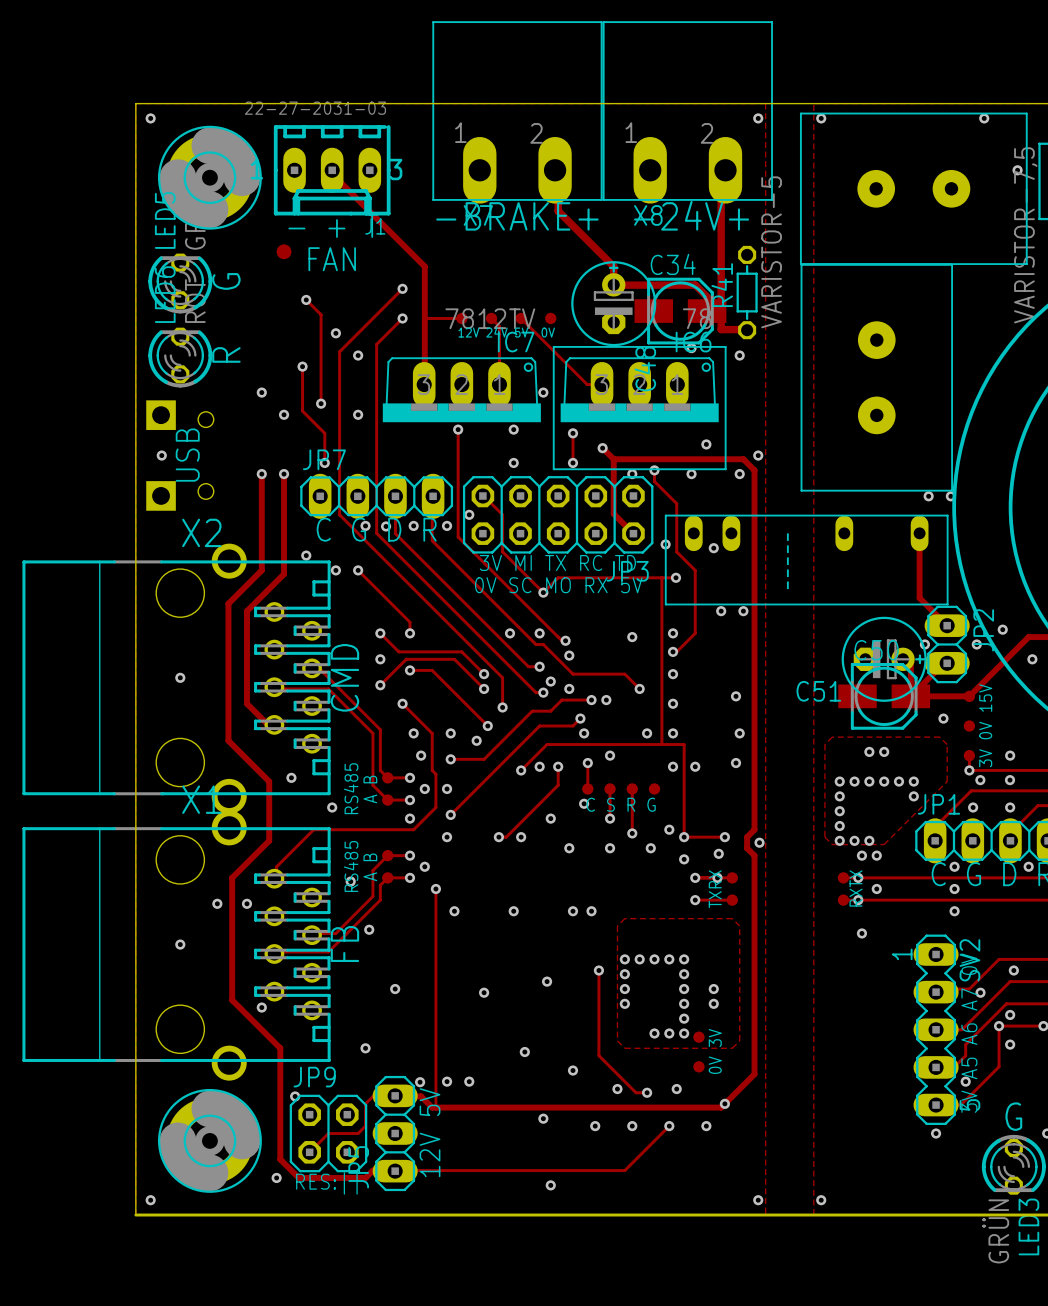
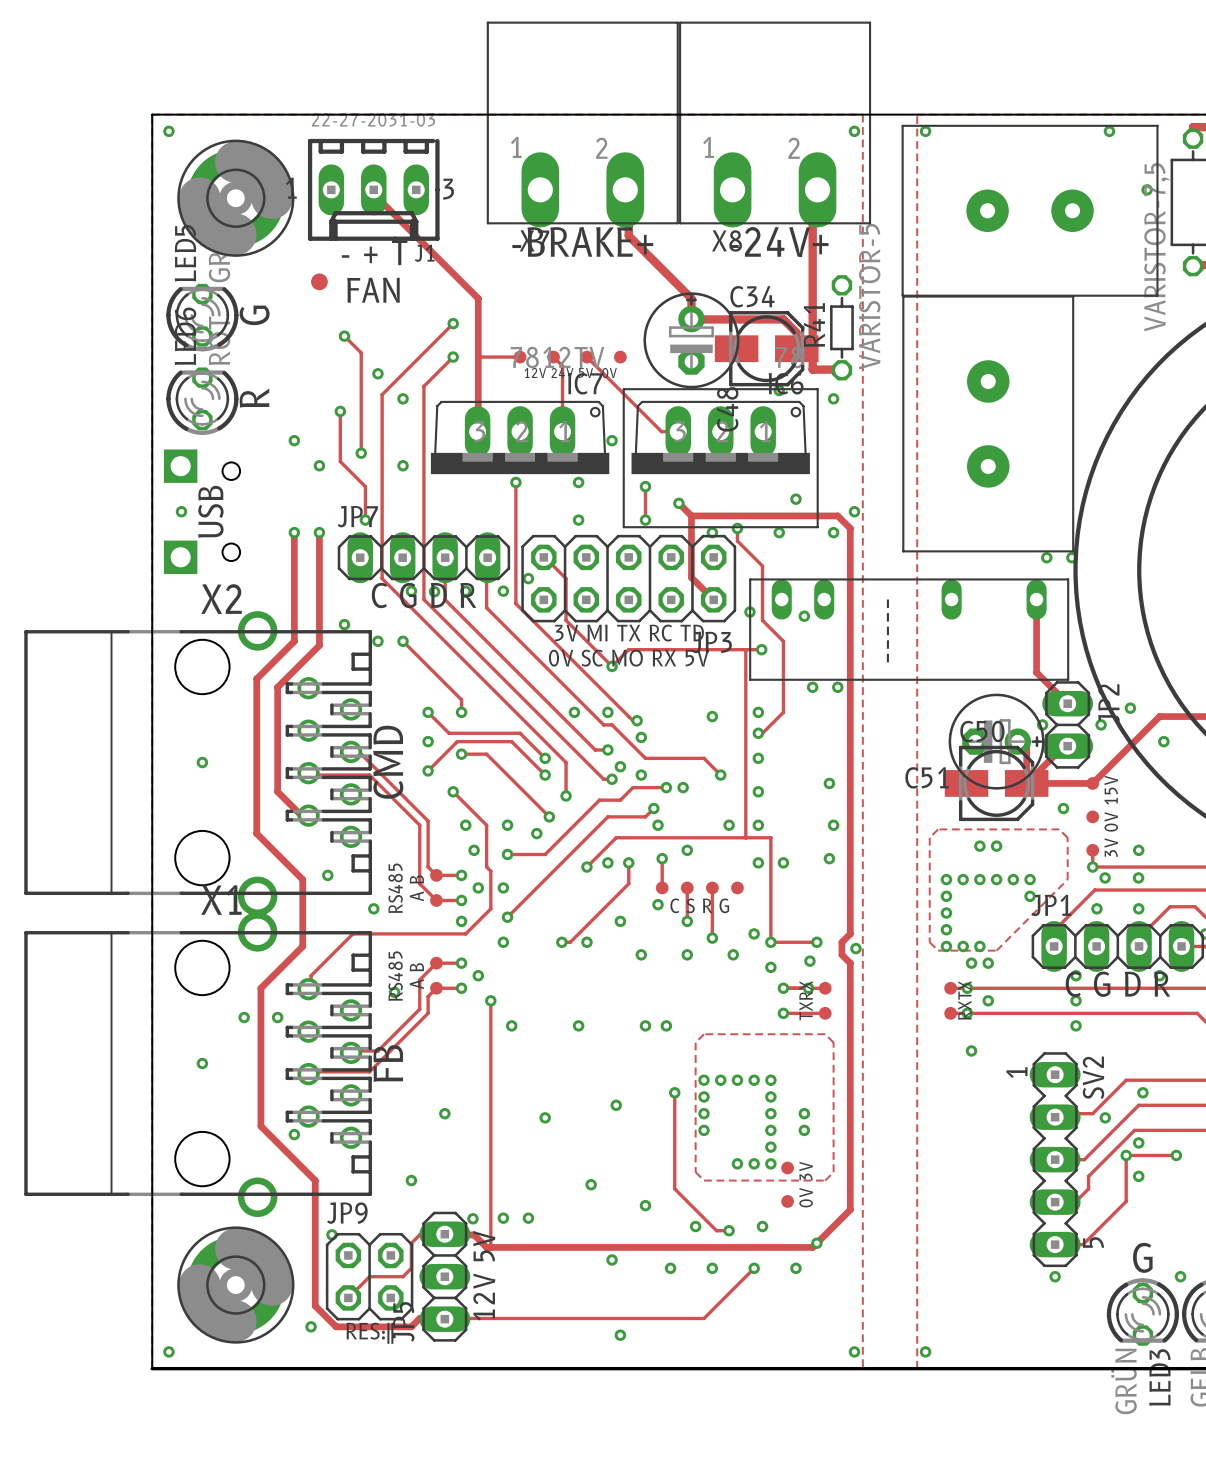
via: (369, 929) -> none
text: 3V A5 A6 A7 0V (969, 1033) -> none
via: (965, 1081) -> none

